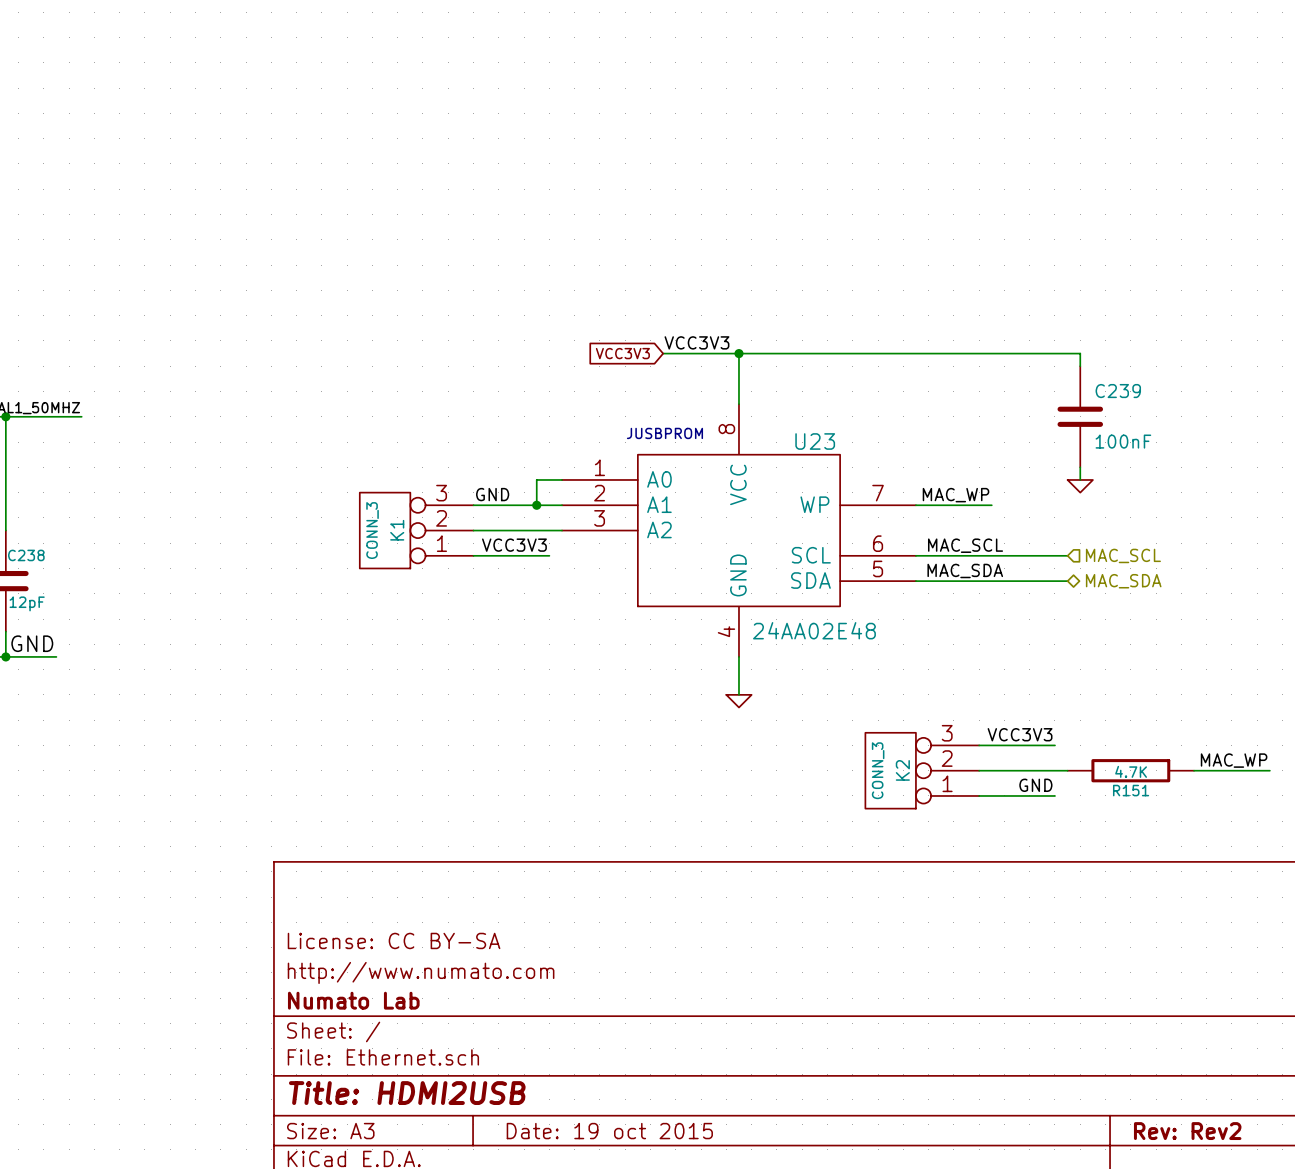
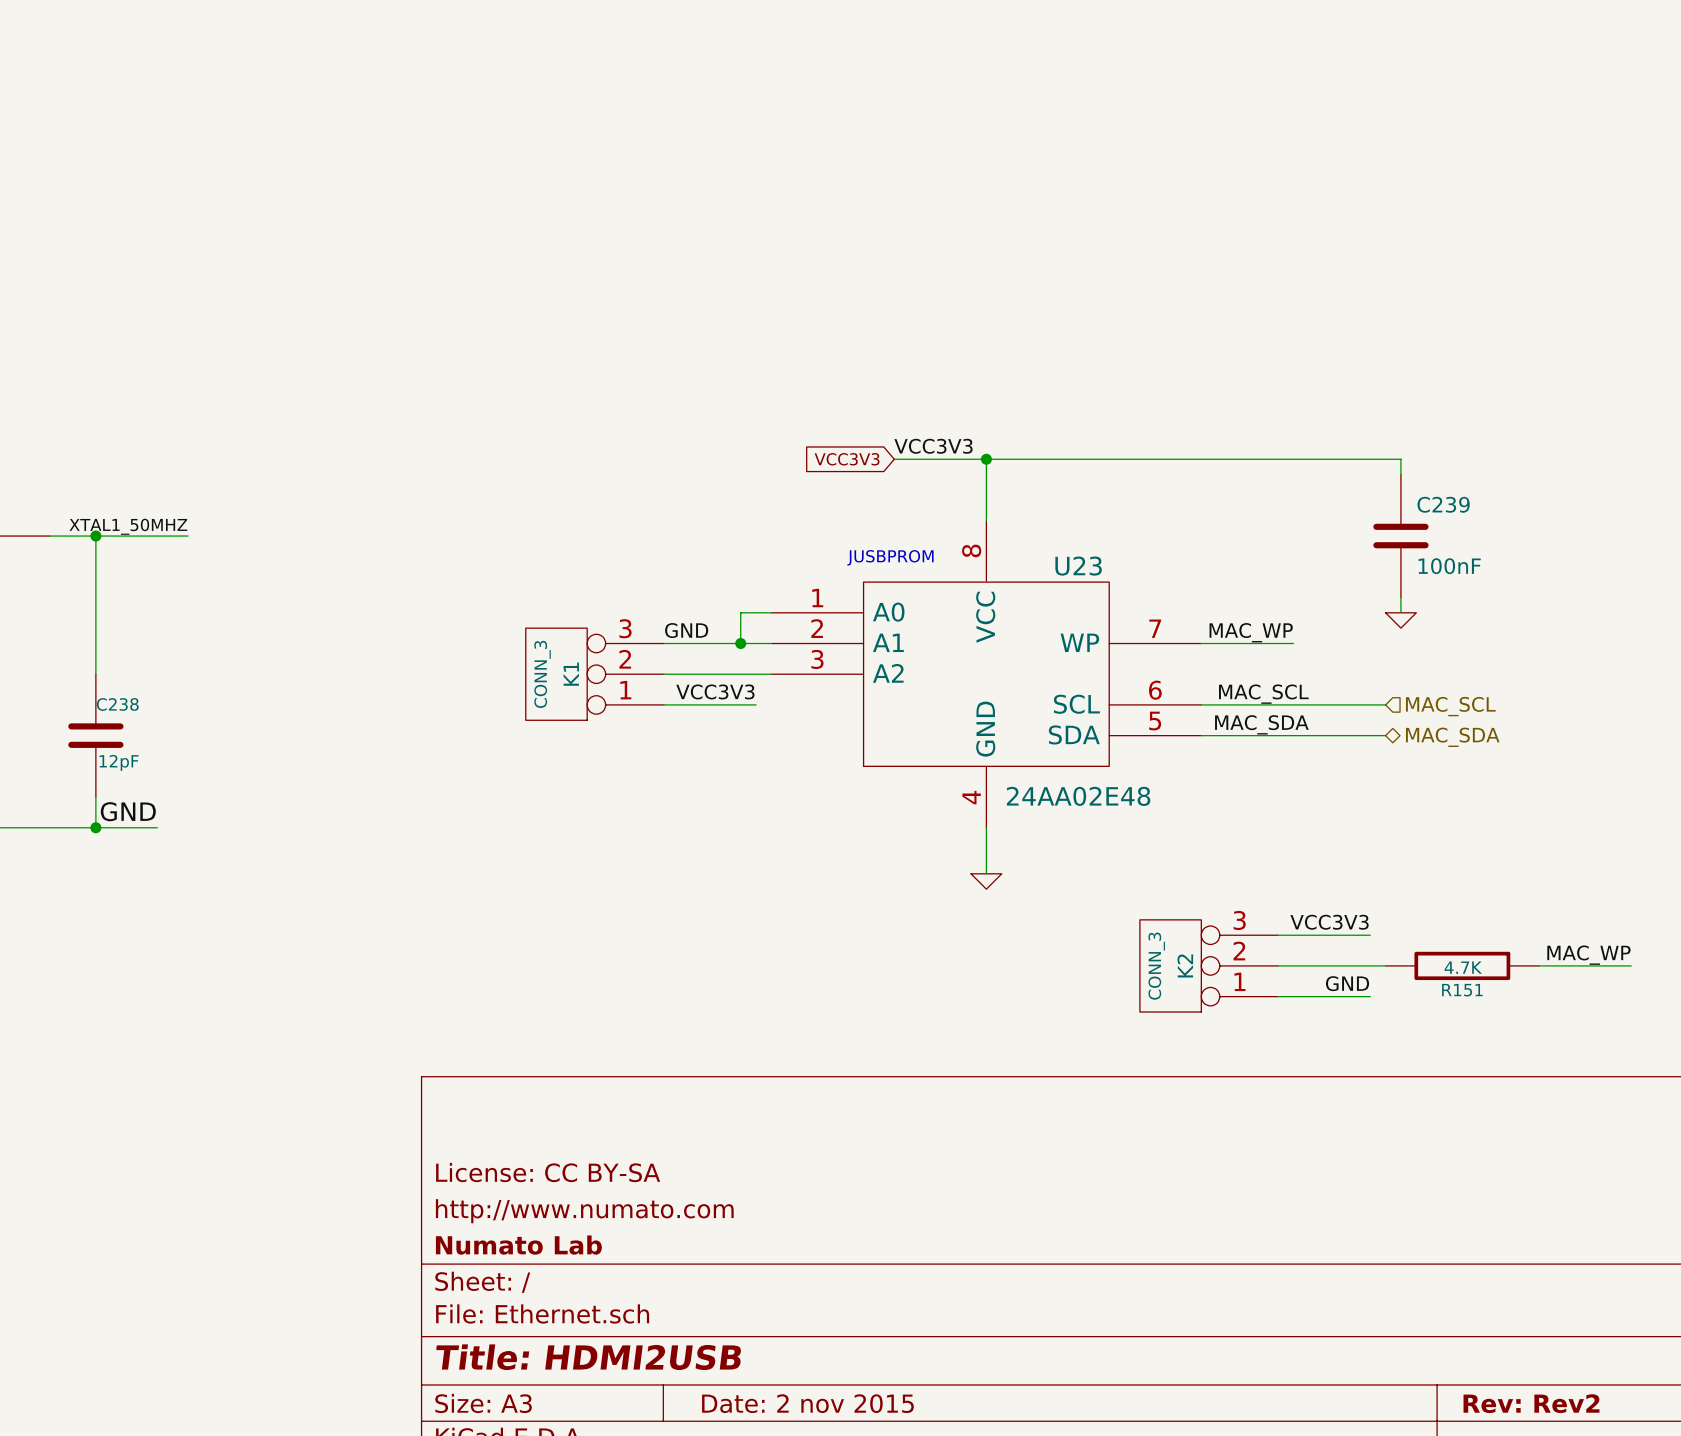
title block: Date: 19 oct 2015 (609, 1131) -> Date: 2 nov 2015 (807, 1403)

